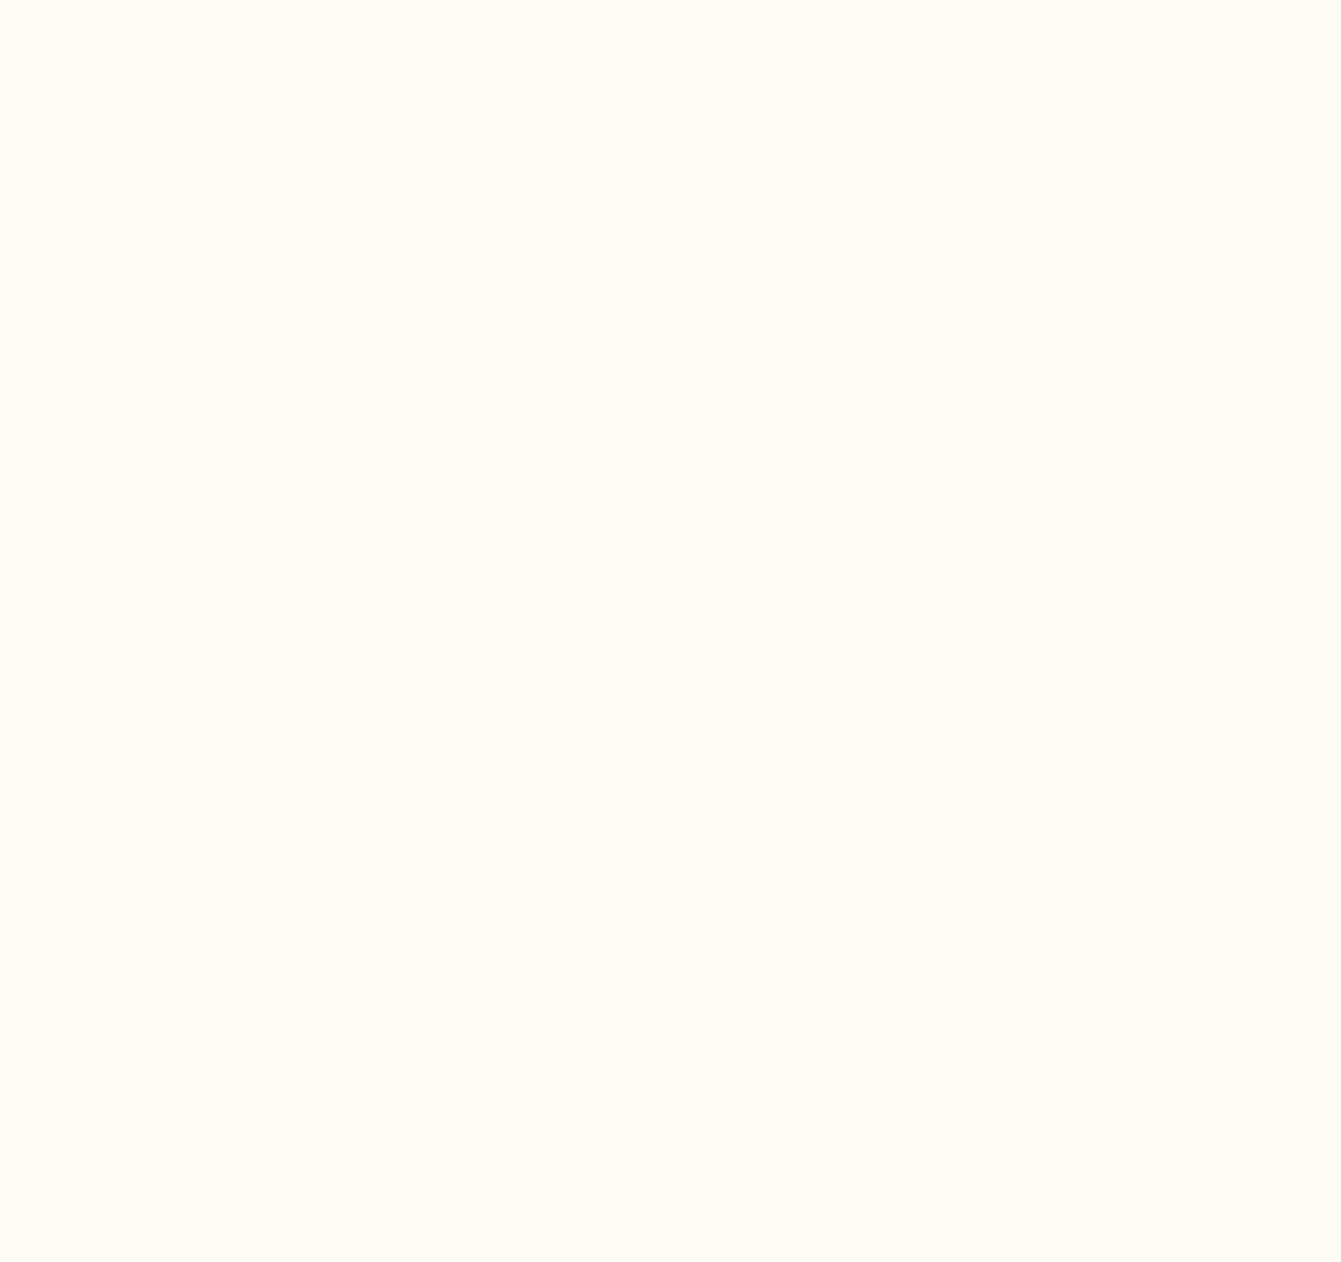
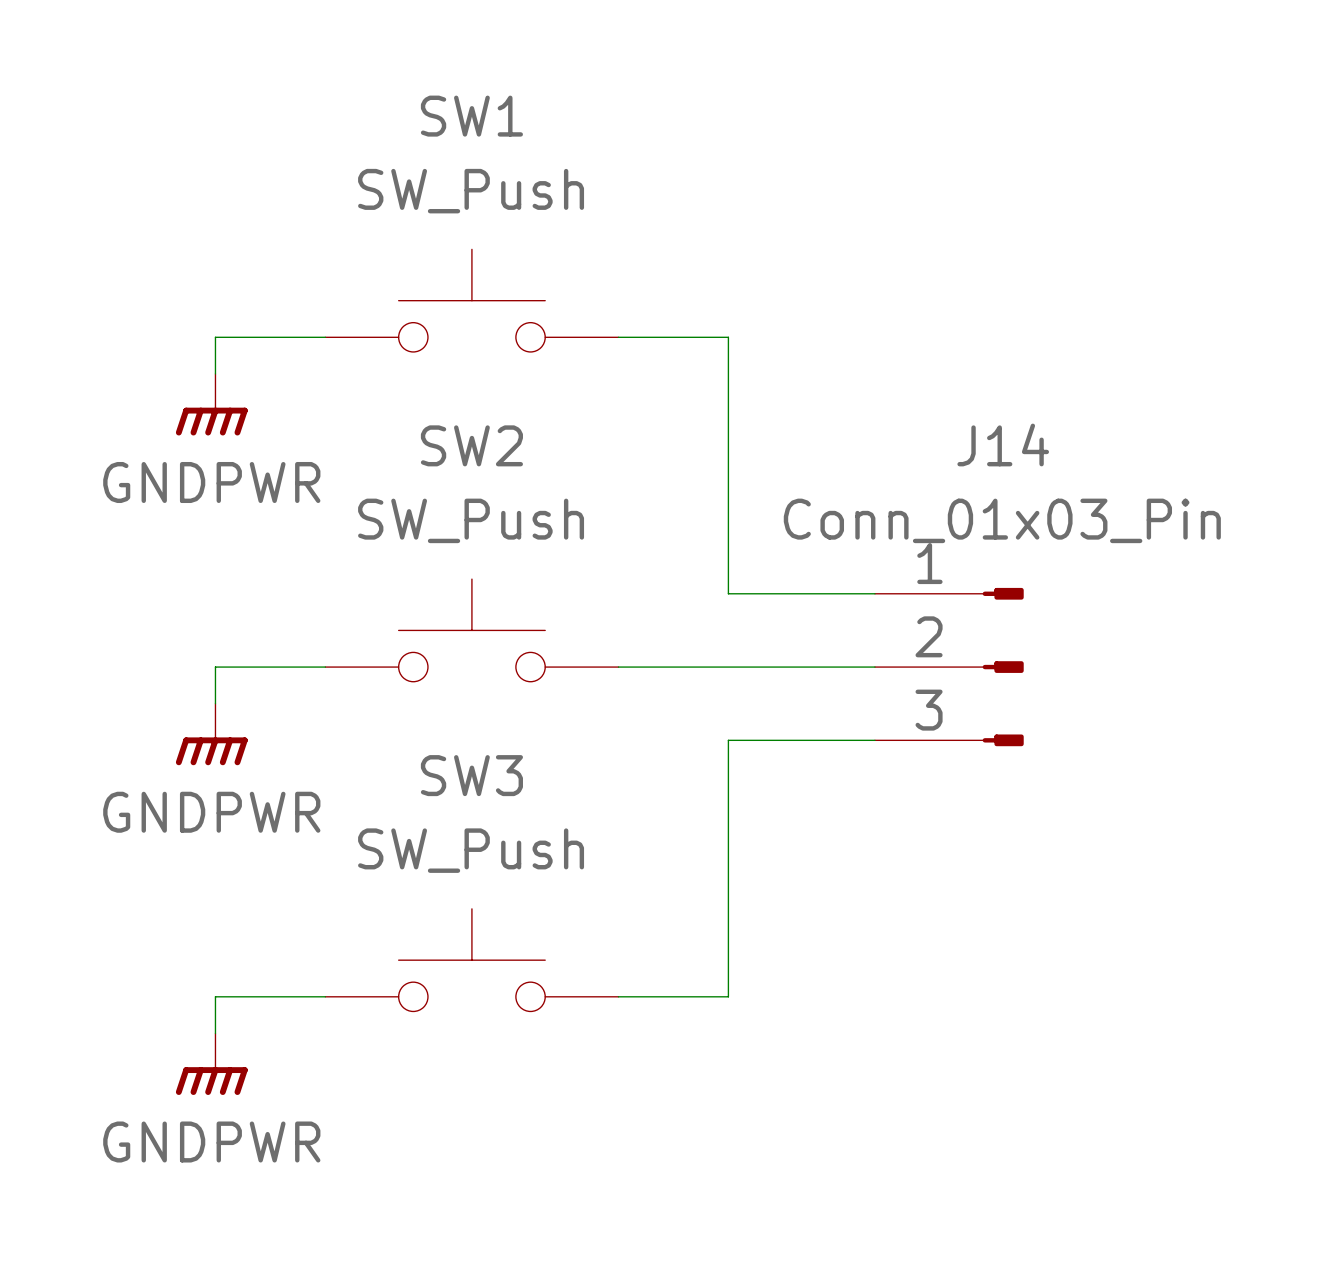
SW1: none -> SW_Push (471, 300)
wire: none -> (325, 337) (215, 337) (215, 373)
wire: none -> (618, 337) (728, 337) (728, 593) (874, 593)
power symbol: none -> GNDPWR (211, 404)
SW2: none -> SW_Push (471, 630)
wire: none -> (325, 667) (215, 667) (215, 703)
wire: none -> (618, 667) (874, 667)
J14: none -> Conn_01x03_Pin (949, 667)
power symbol: none -> GNDPWR (211, 734)
wire: none -> (874, 740) (728, 740) (728, 996) (618, 996)
SW3: none -> SW_Push (471, 960)
wire: none -> (325, 996) (215, 996) (215, 1033)
power symbol: none -> GNDPWR (211, 1064)

